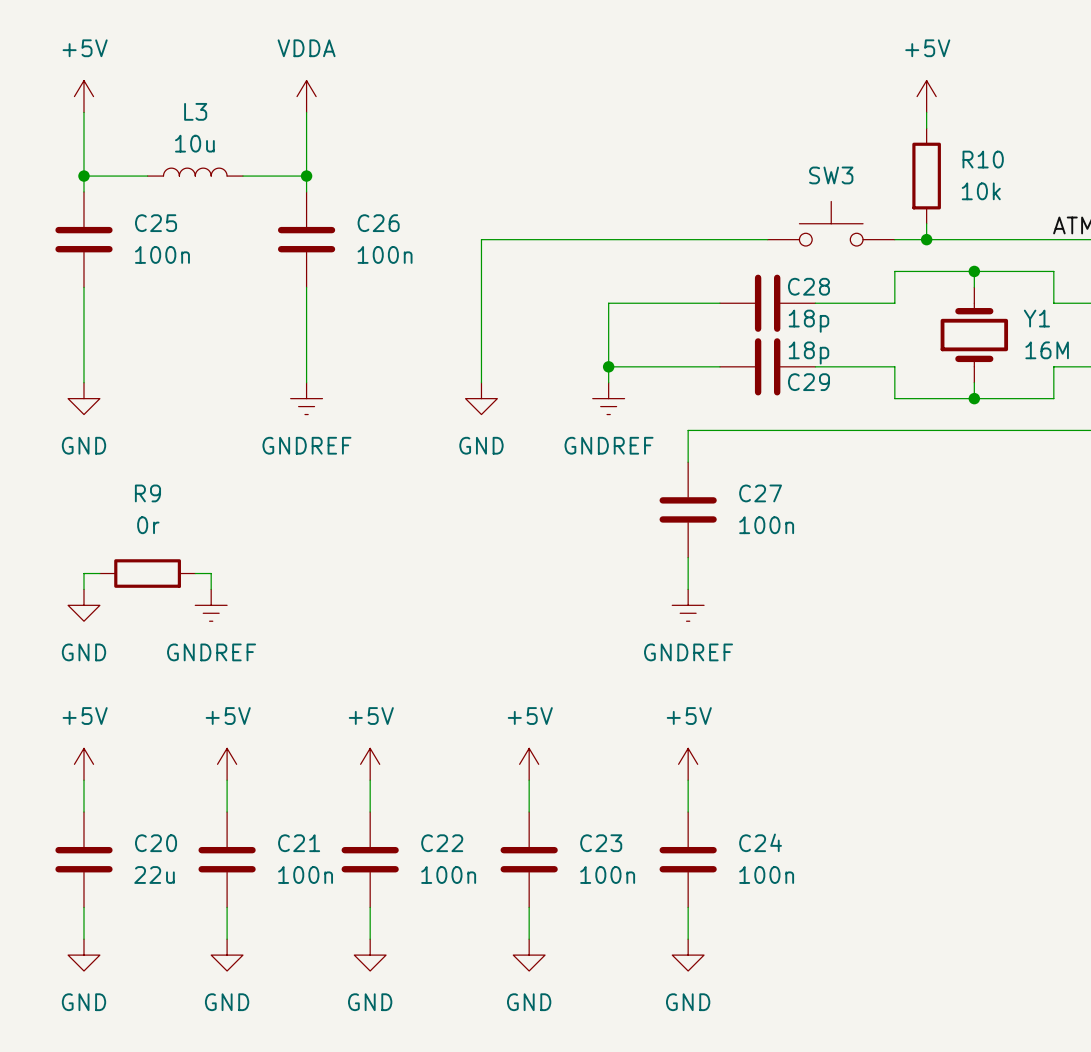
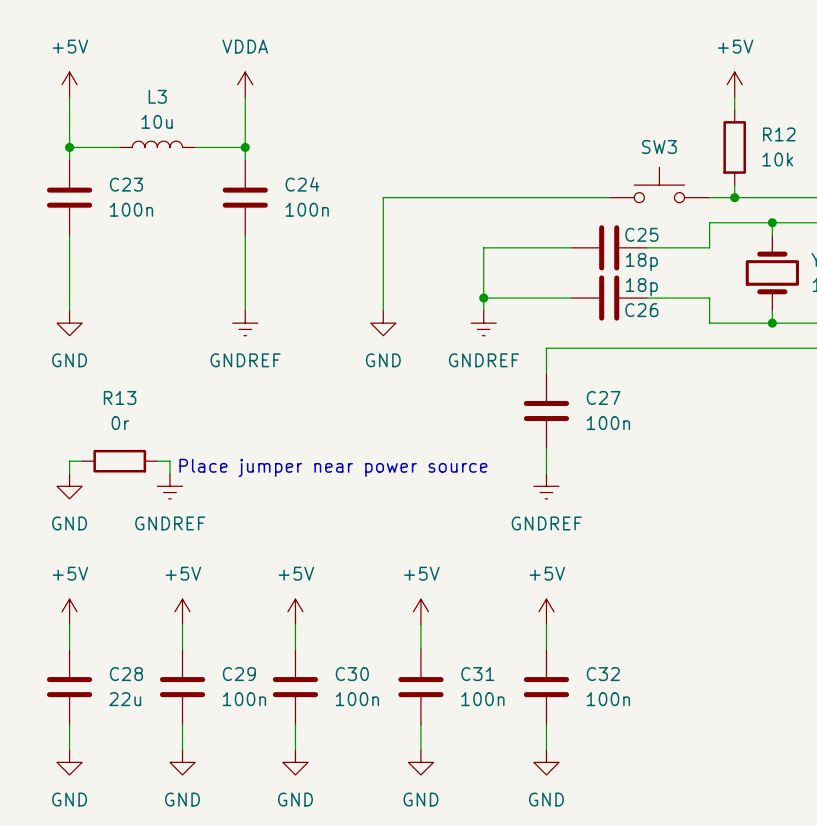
R10 name: R10 (983, 159) -> R12 (779, 134)
C25 name: C25 (156, 223) -> C23 (126, 184)
C26 name: C26 (378, 223) -> C24 (302, 184)
C28 name: C28 (808, 286) -> C25 (641, 234)
C29 name: C29 (808, 382) -> C26 (641, 310)
R9 name: R9 (147, 493) -> R13 (120, 397)
text: none -> Place jumper near power source (333, 467)
C24 name: C24 (760, 842) -> C32 (603, 674)
C20 name: C20 (156, 843) -> C28 (126, 674)
C21 name: C21 (299, 843) -> C29 (239, 674)
C22 name: C22 (442, 843) -> C30 (352, 674)
C23 name: C23 (601, 843) -> C31 (477, 674)

